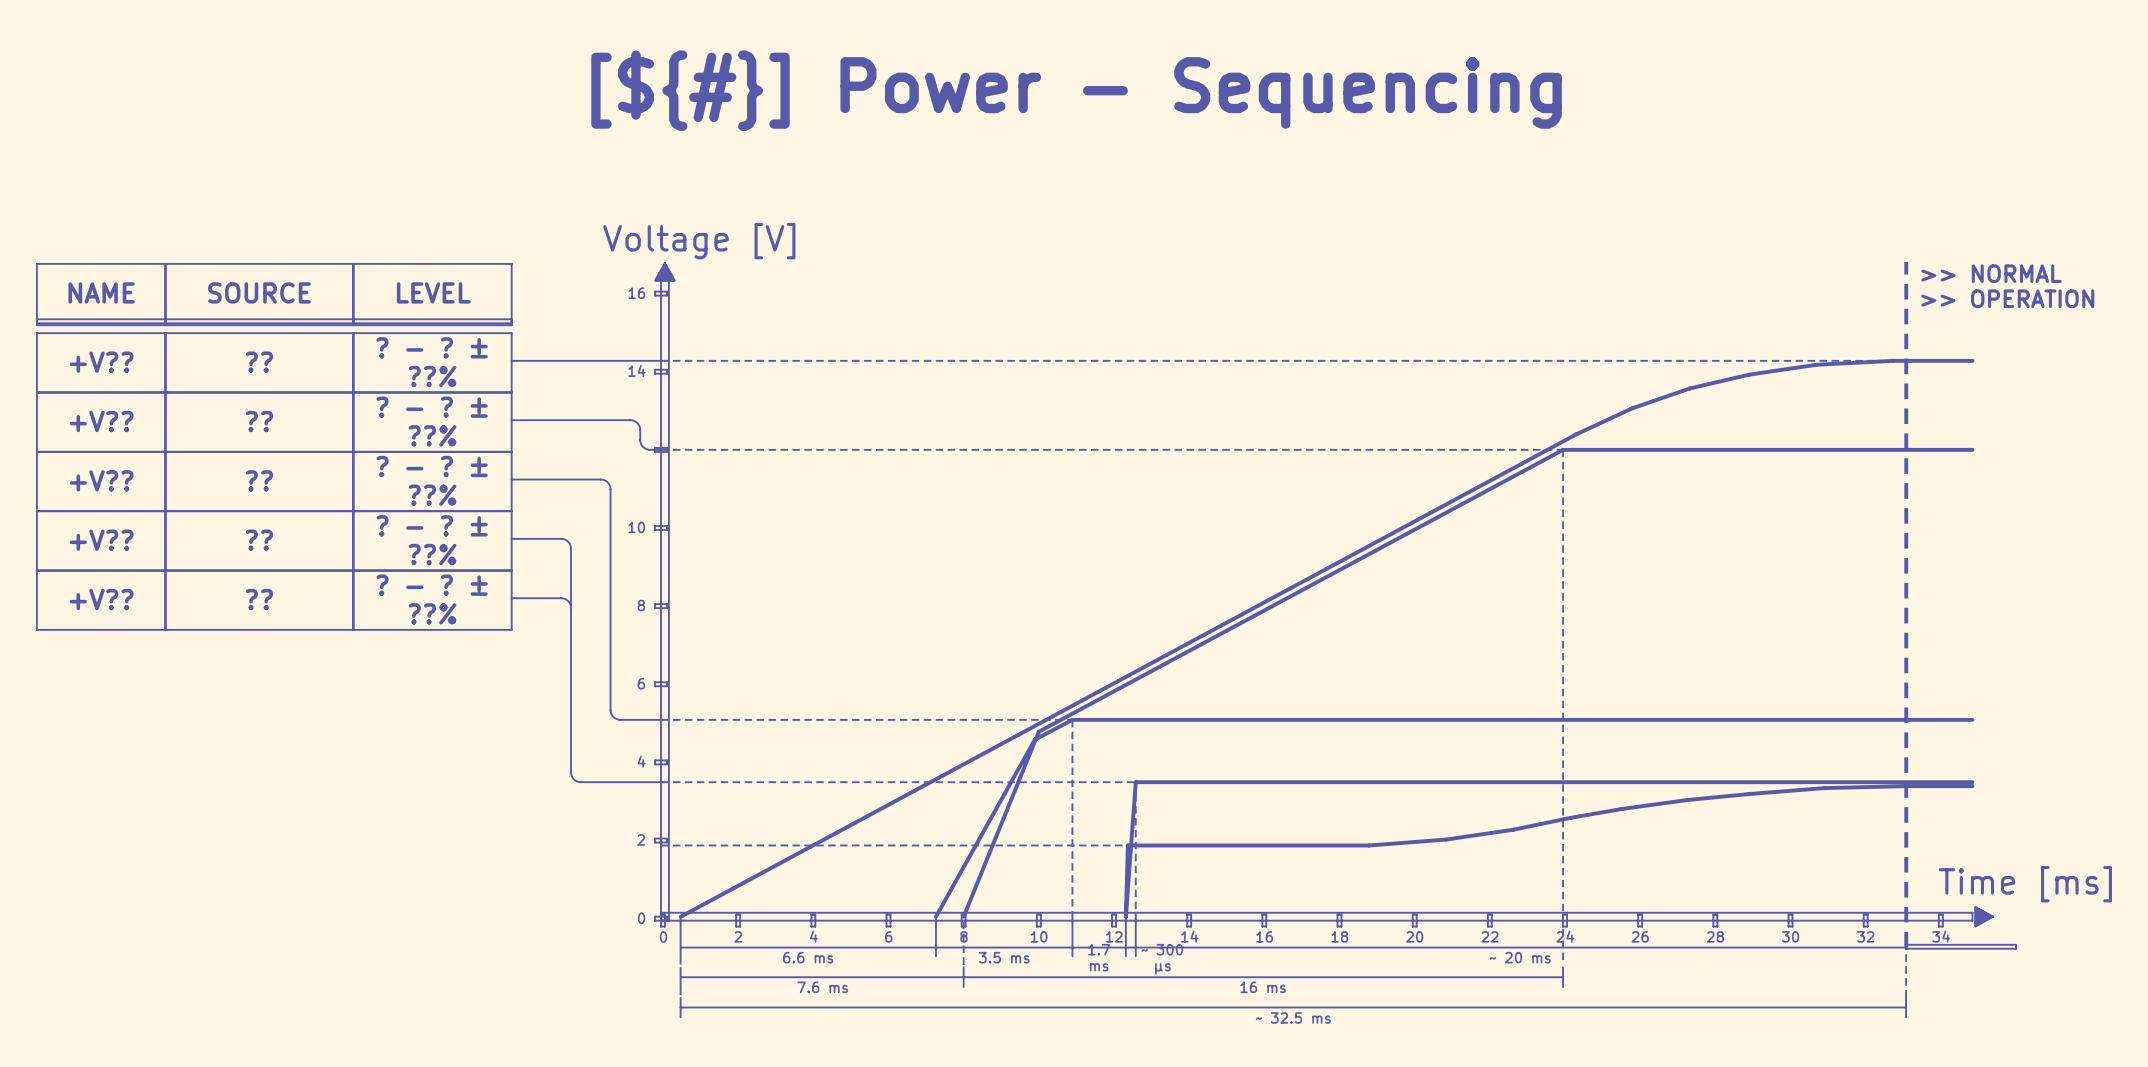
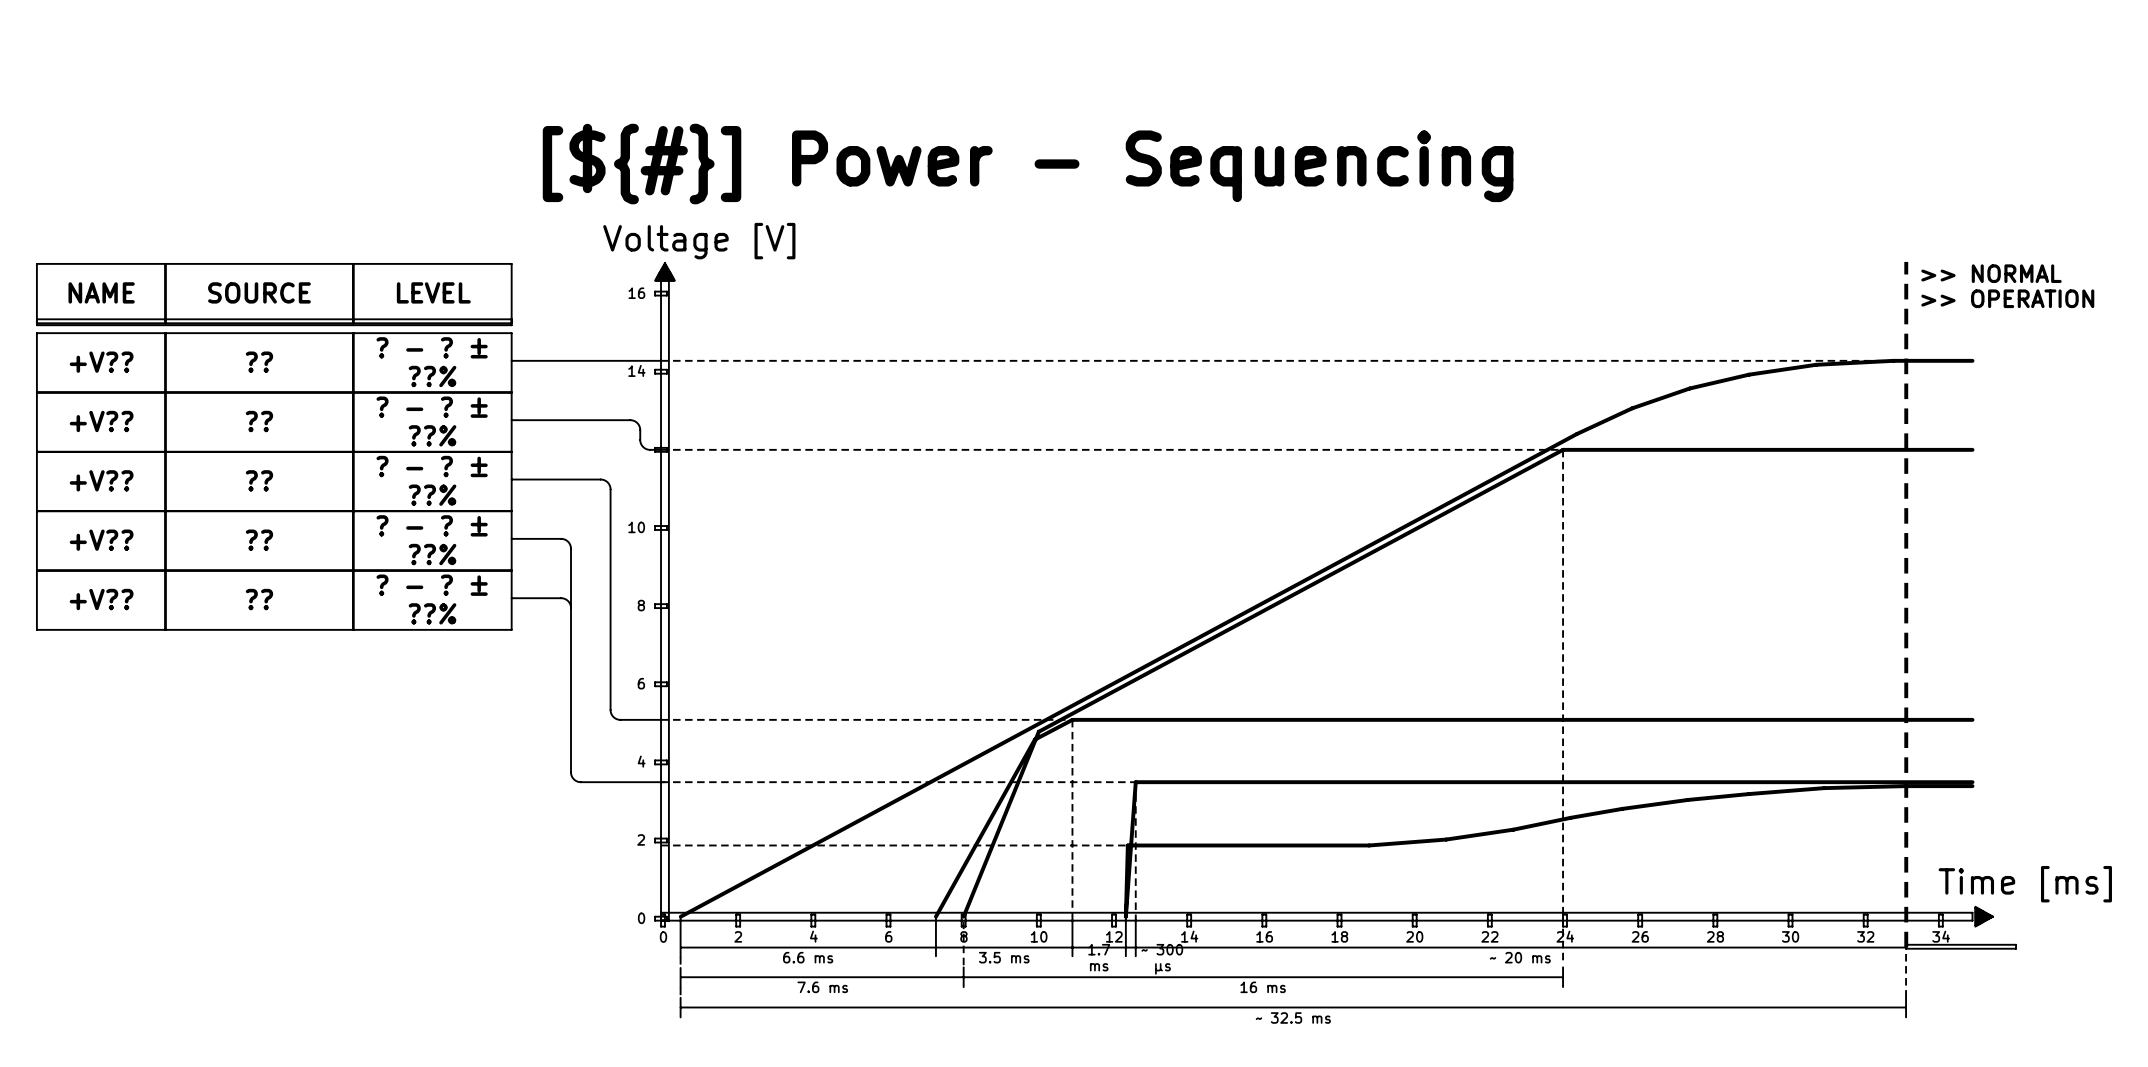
text position: [${#}] Power - Sequencing (1076, 90) -> [${#}] Power - Sequencing (1028, 164)

